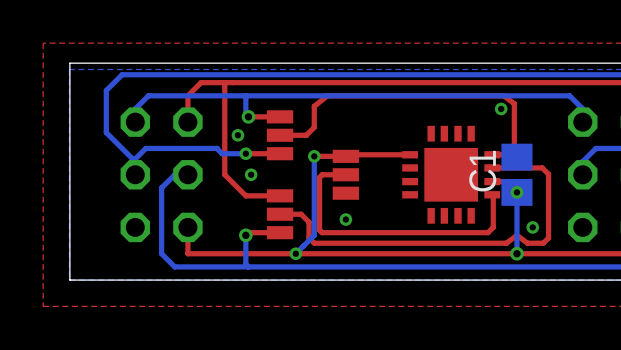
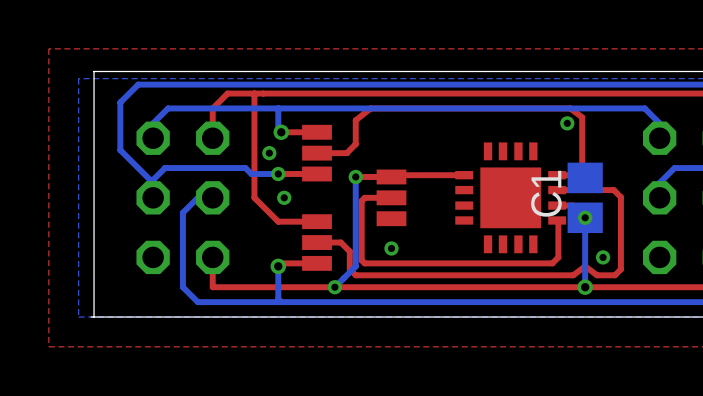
board edge: (83, 63) (69, 63) (69, 280) (80, 280) -> (94, 71) (94, 317)

